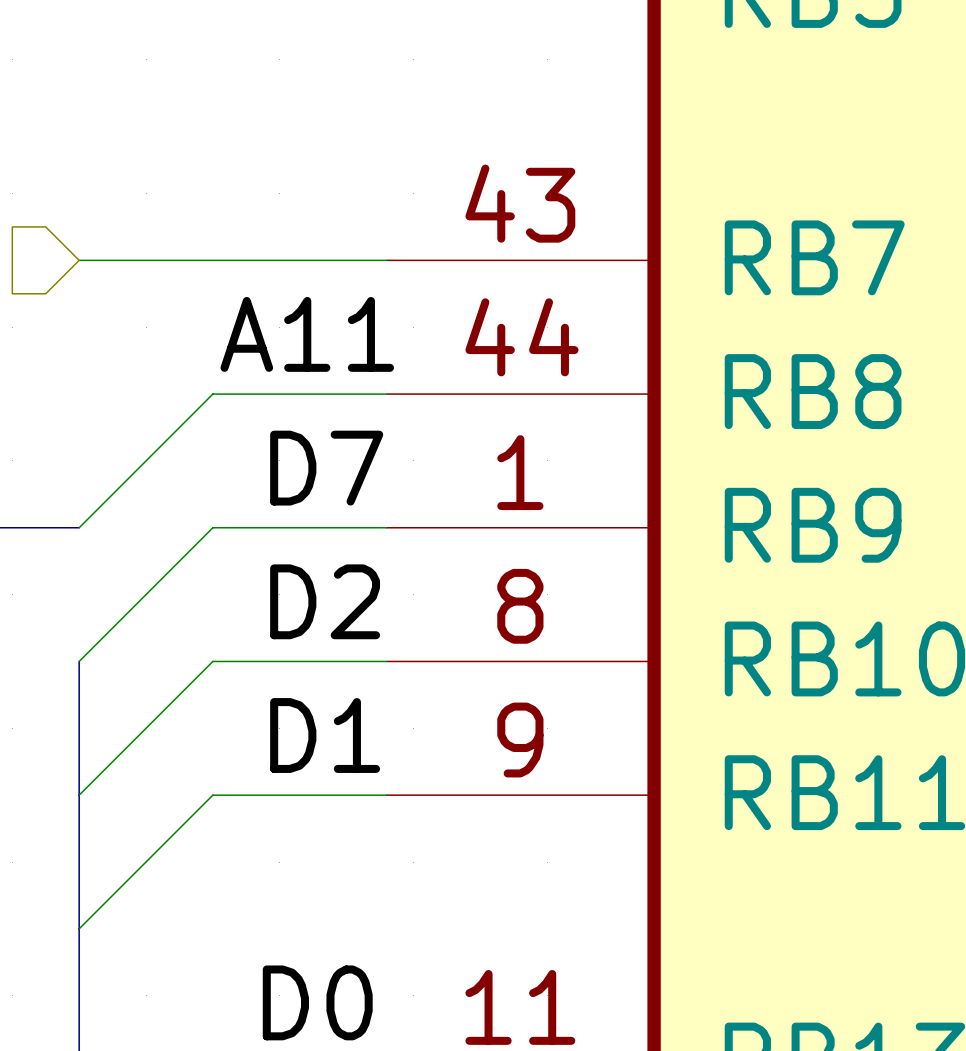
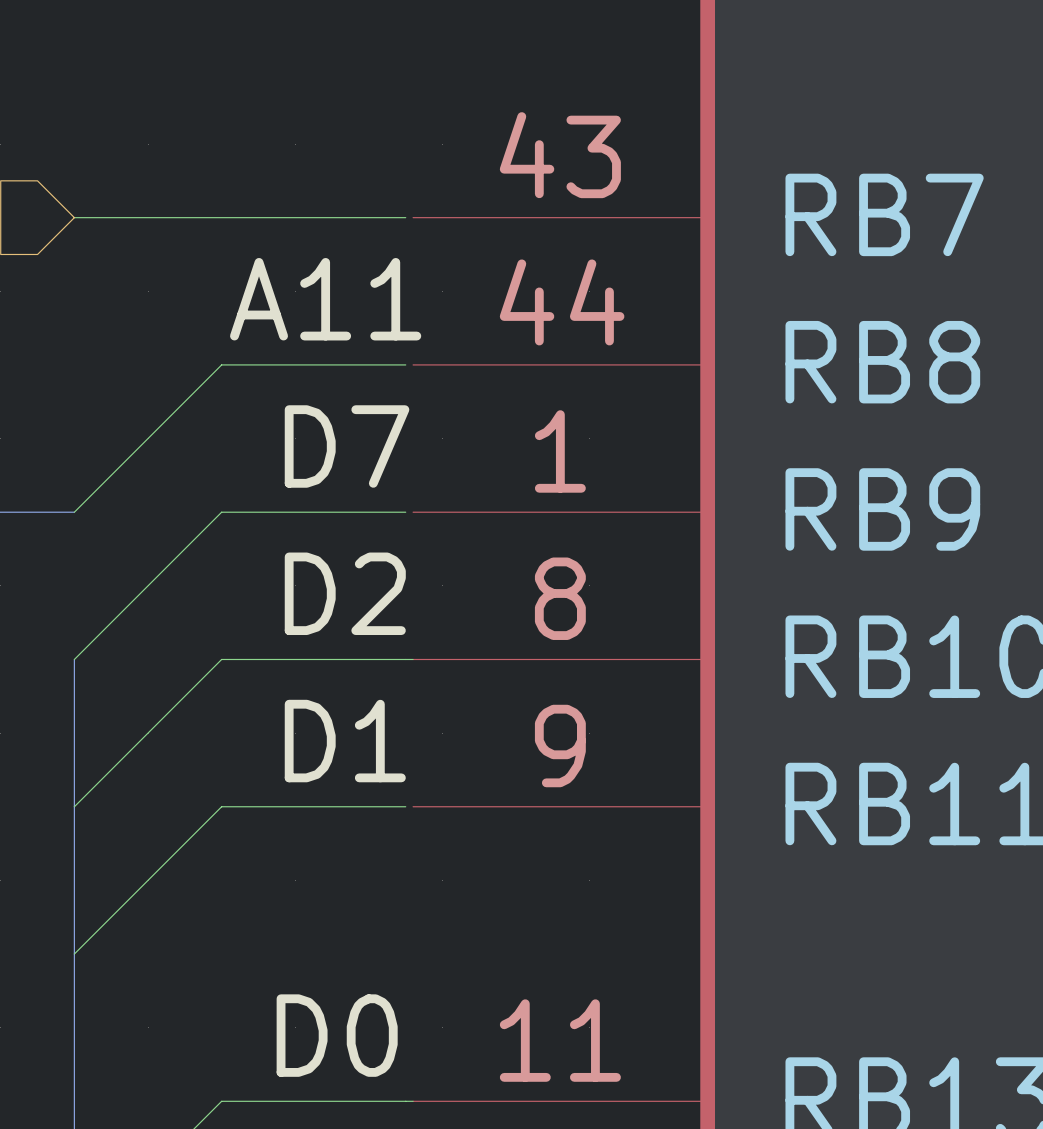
wire: (379, 260) (386, 260) -> none
wire: (379, 394) (386, 394) -> none
wire: (379, 527) (386, 527) -> none
wire: (379, 795) (386, 795) -> none

